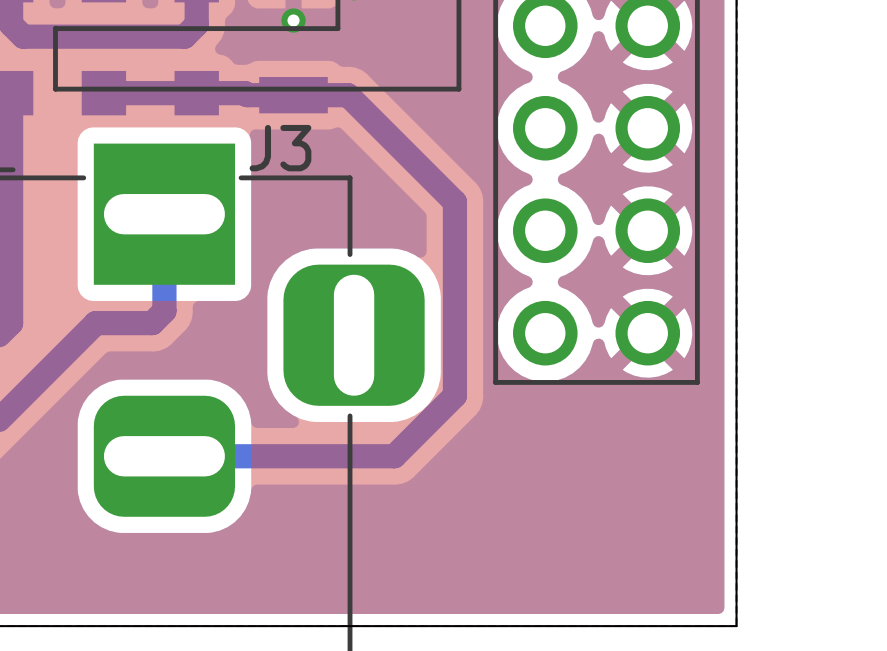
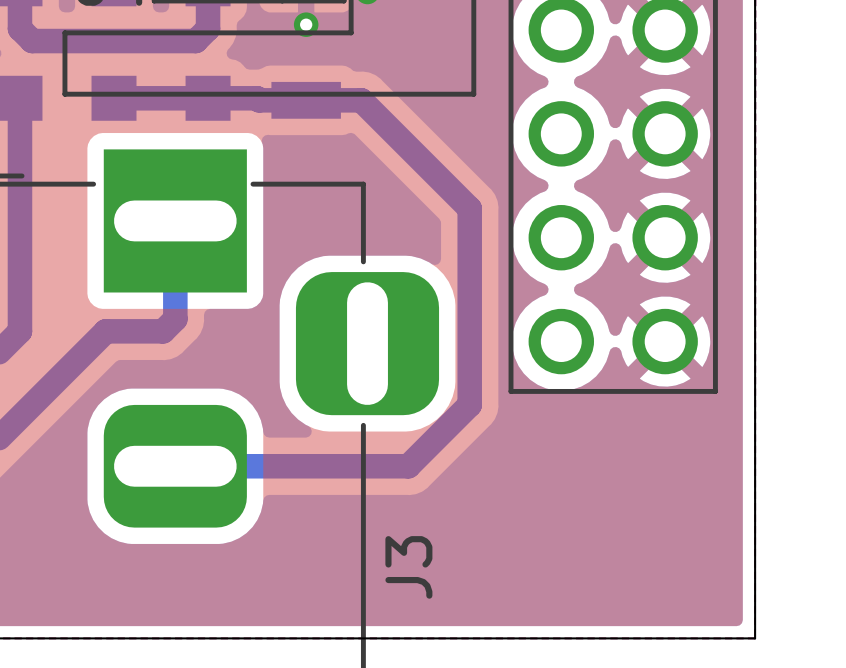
J3 name rotation: 0° (280, 148) -> 90° counterclockwise (408, 567)
J3 name position: J3 (280, 148) -> J3 (408, 567)

